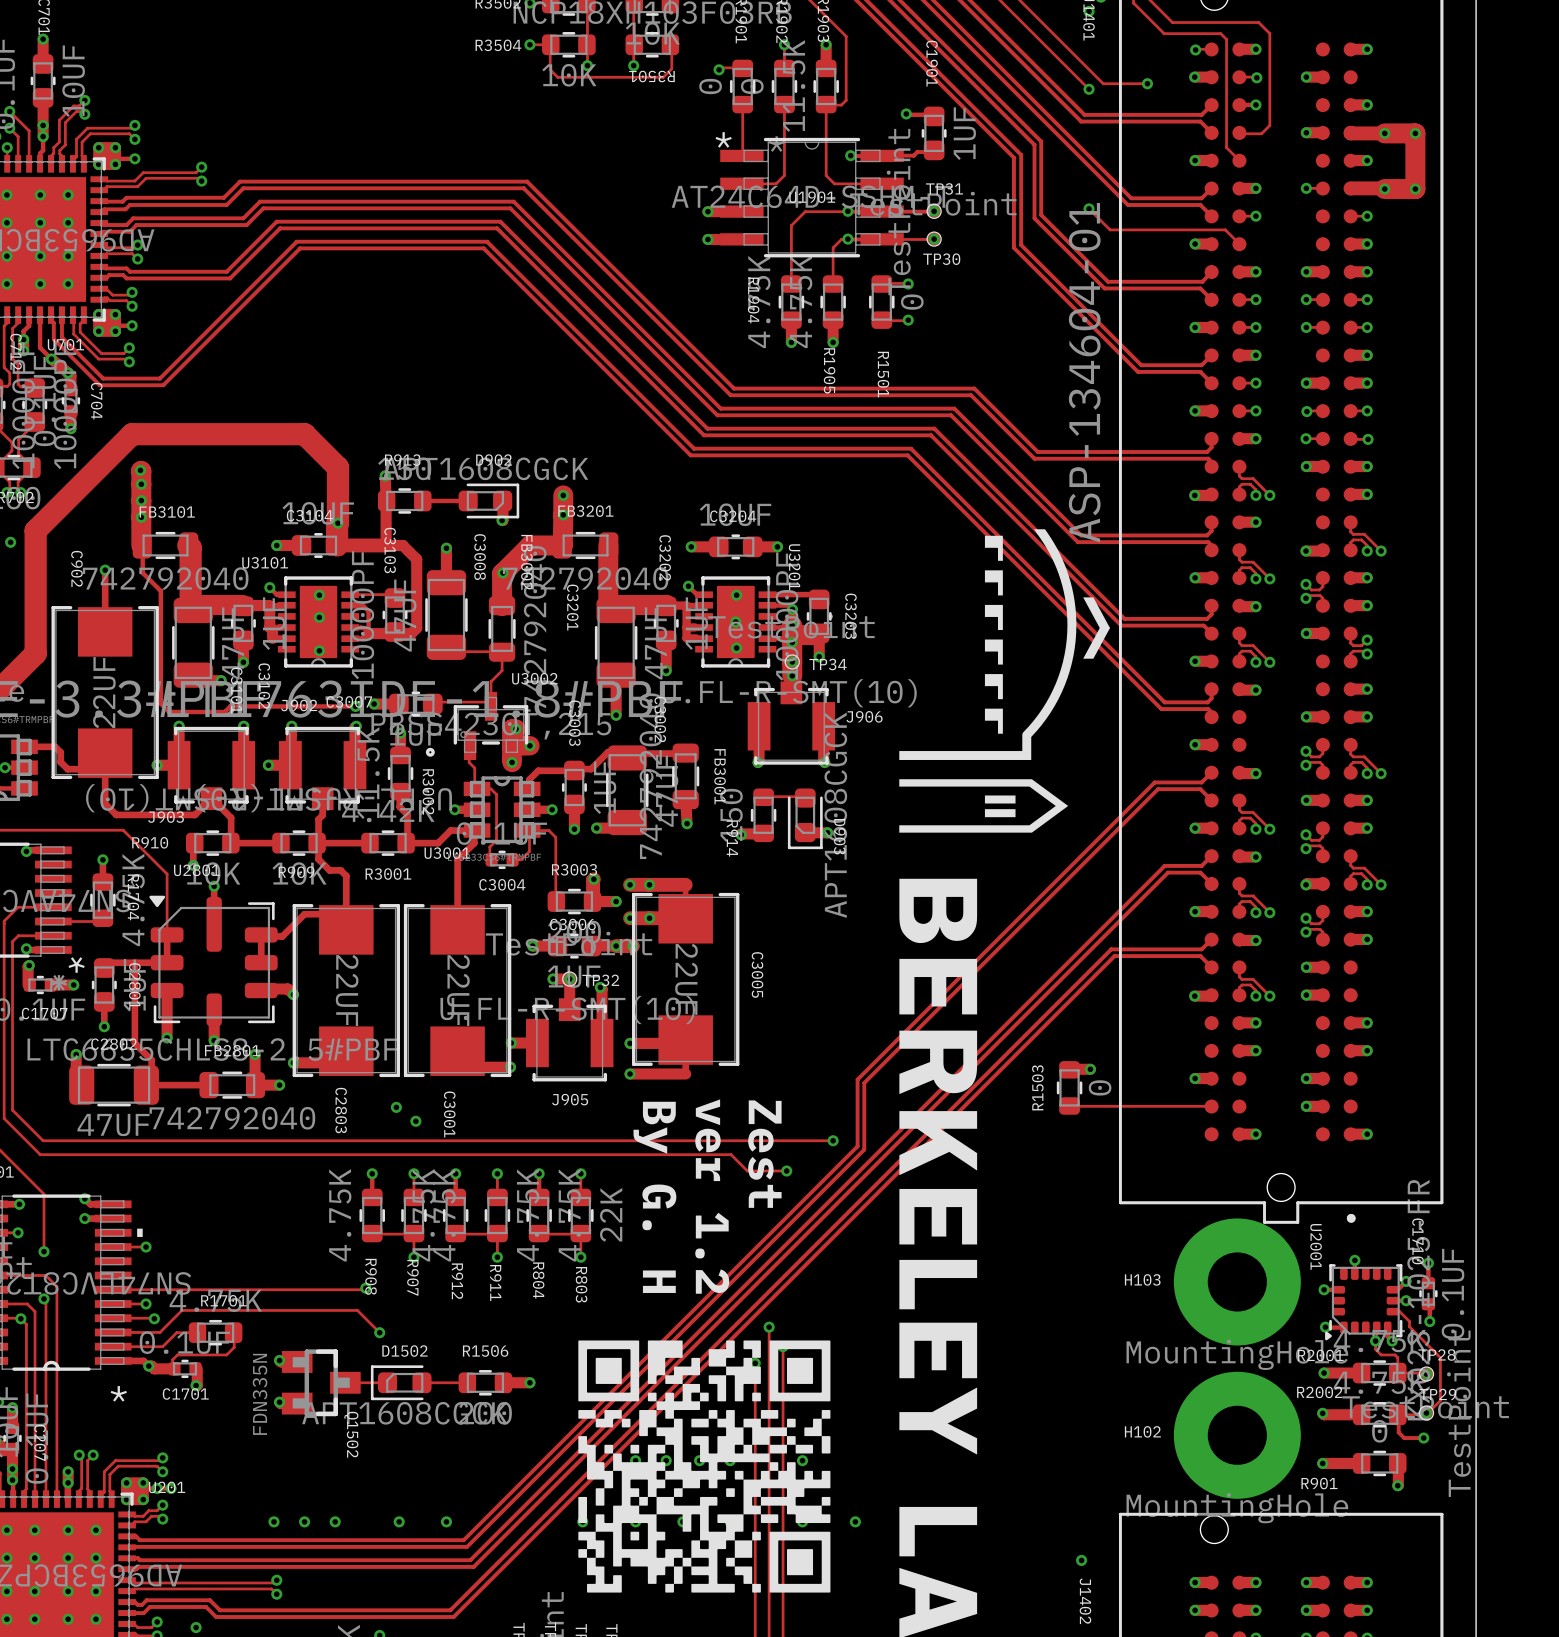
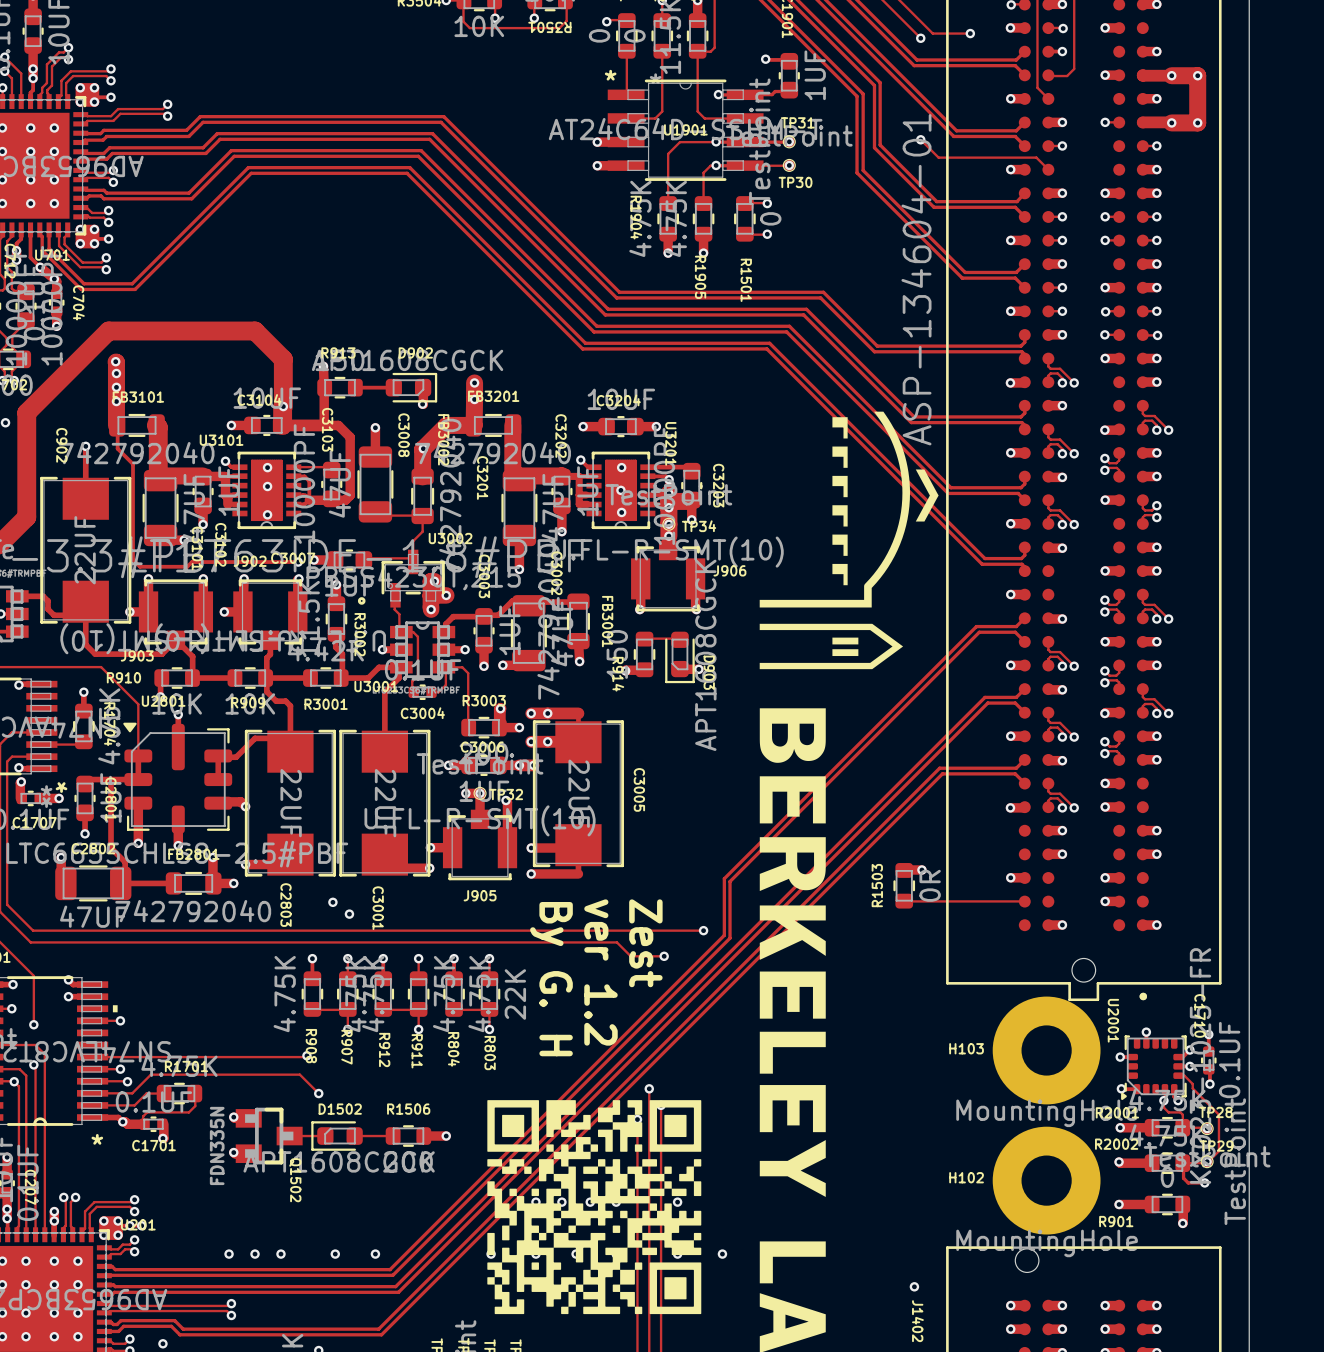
R1503 value: 0 (1100, 1087) -> 0R (930, 885)

